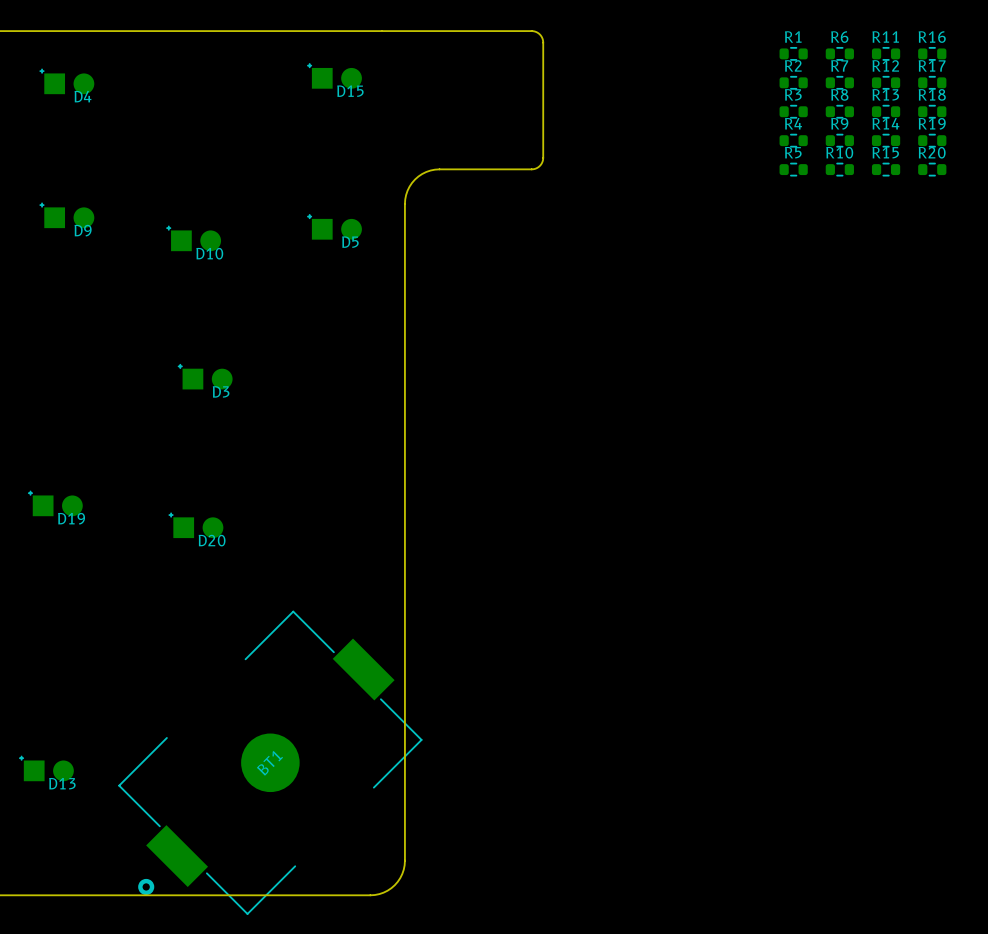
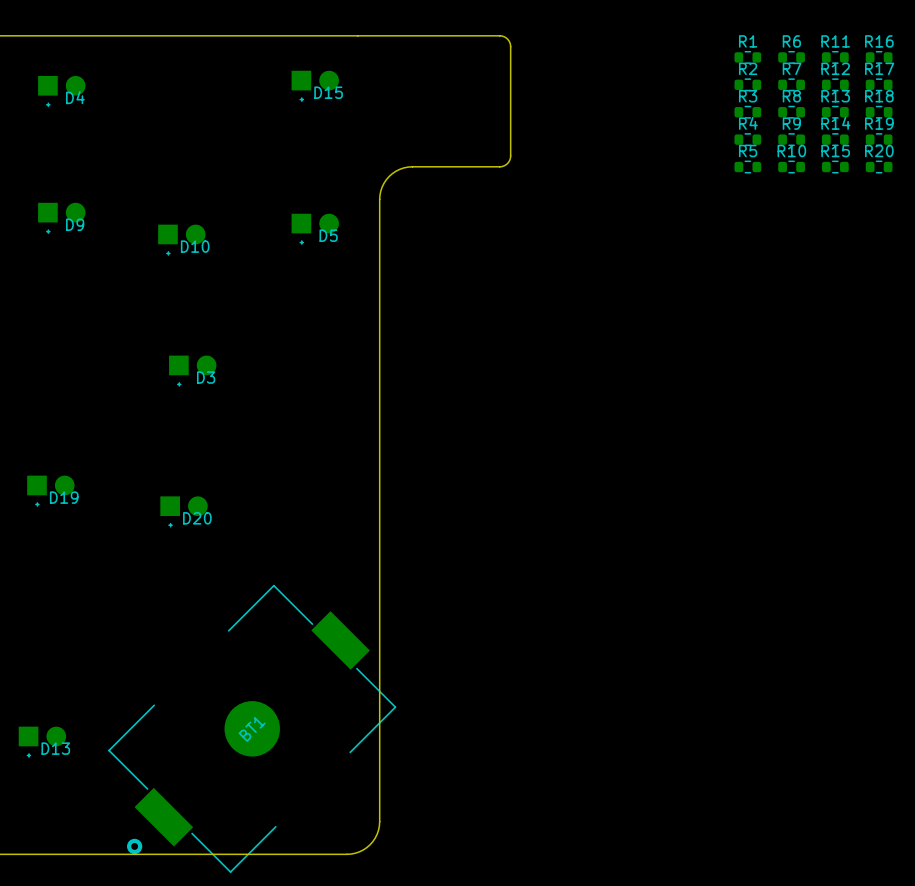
D15 footprint: [307, 63, 362, 89] -> [291, 70, 339, 102]
D4 footprint: [39, 68, 95, 95] -> [38, 75, 86, 107]
D9 footprint: [39, 202, 95, 229] -> [38, 202, 86, 234]
D5 footprint: [307, 214, 362, 240] -> [291, 213, 339, 245]
D10 footprint: [166, 225, 222, 252] -> [158, 224, 206, 256]
D3 footprint: [177, 364, 233, 390] -> [169, 355, 217, 387]
D19 footprint: [28, 490, 83, 517] -> [27, 475, 75, 507]
D20 footprint: [168, 512, 224, 539] -> [160, 496, 208, 528]
D13 footprint: [19, 755, 74, 782] -> [18, 726, 67, 758]

